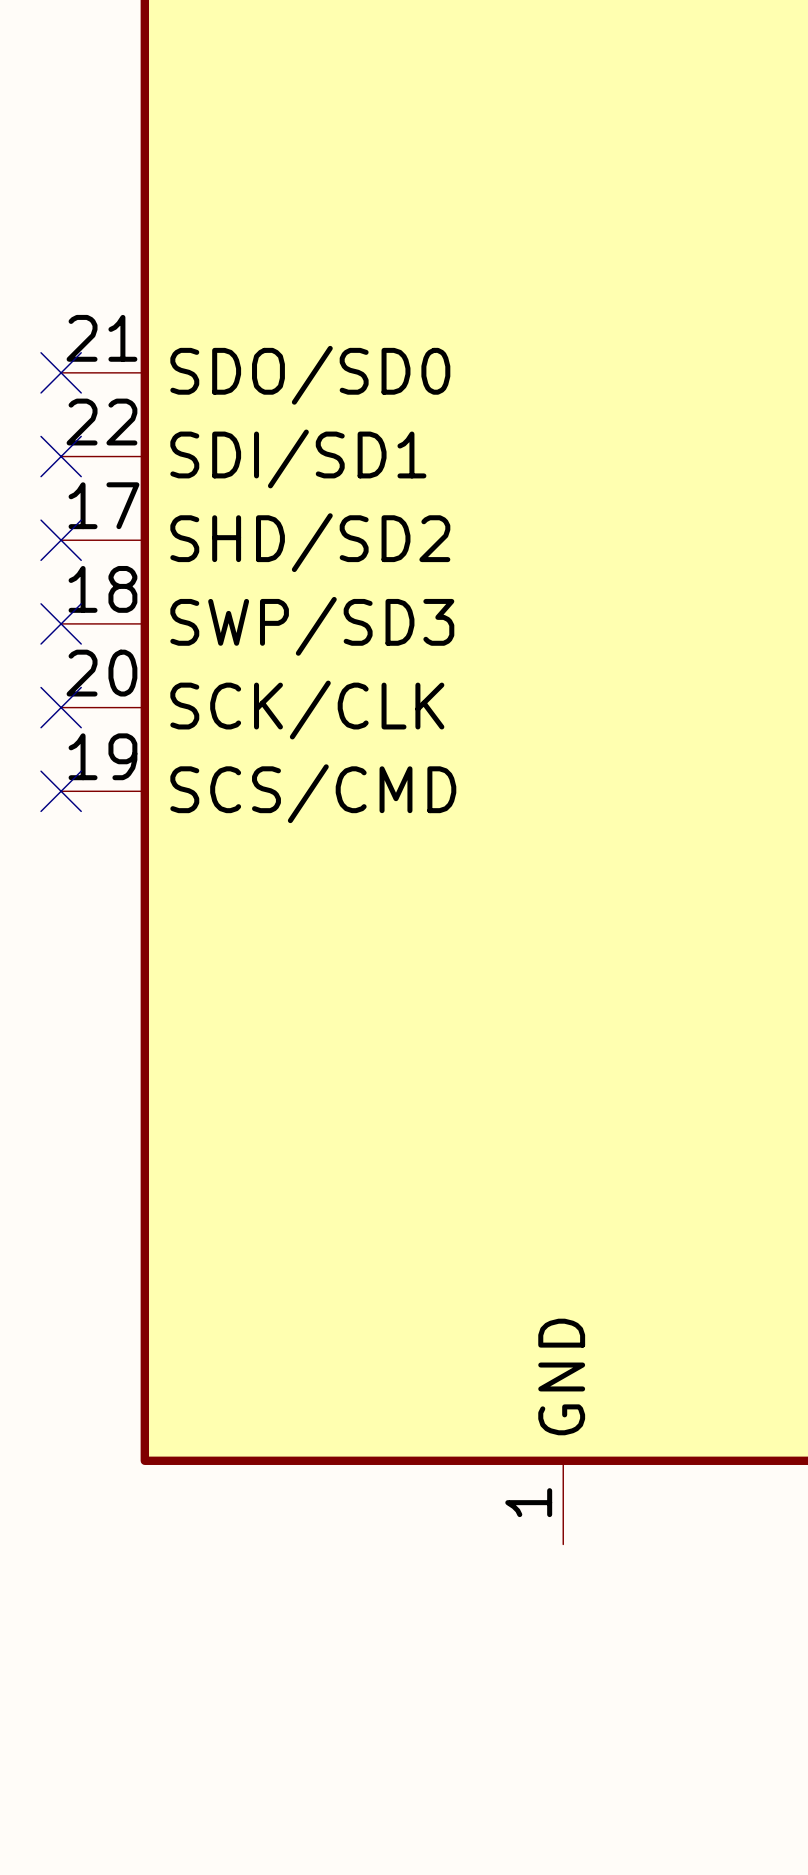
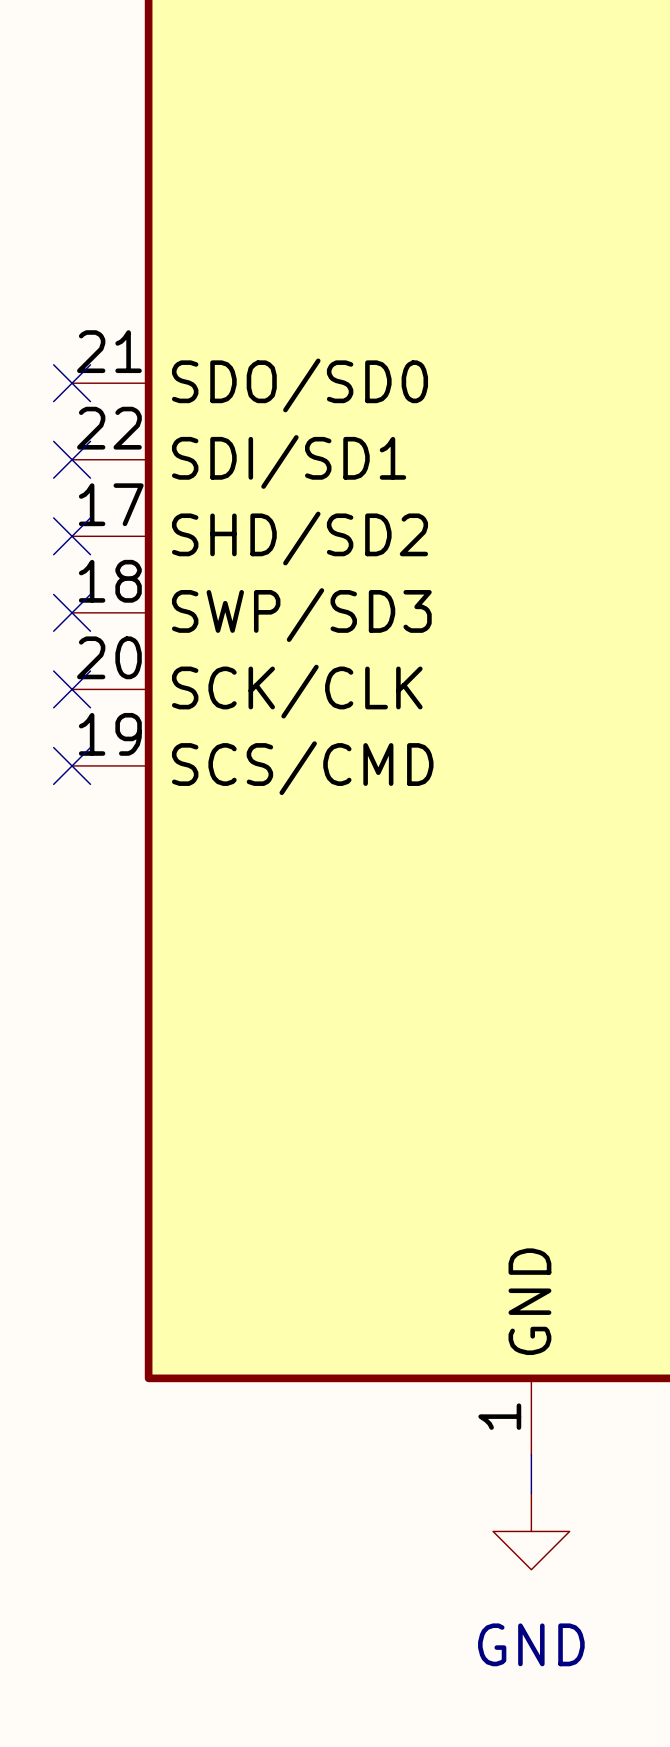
wire: none -> (531, 1454) (531, 1493)
power symbol: none -> GND (531, 1531)

